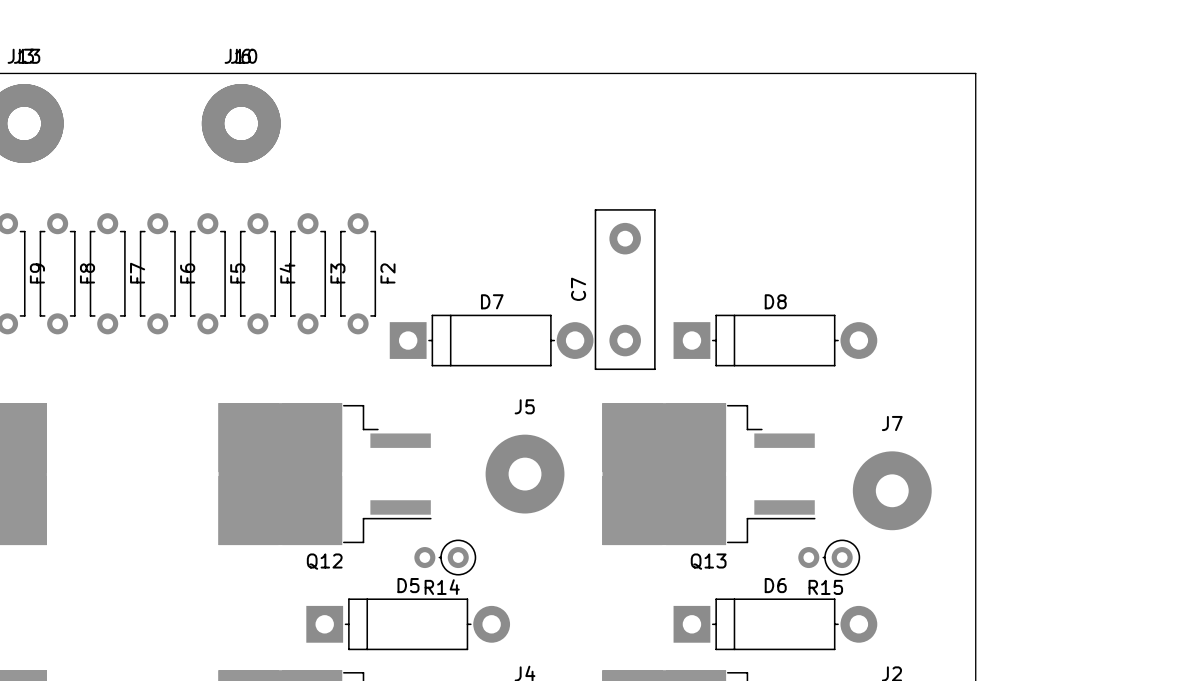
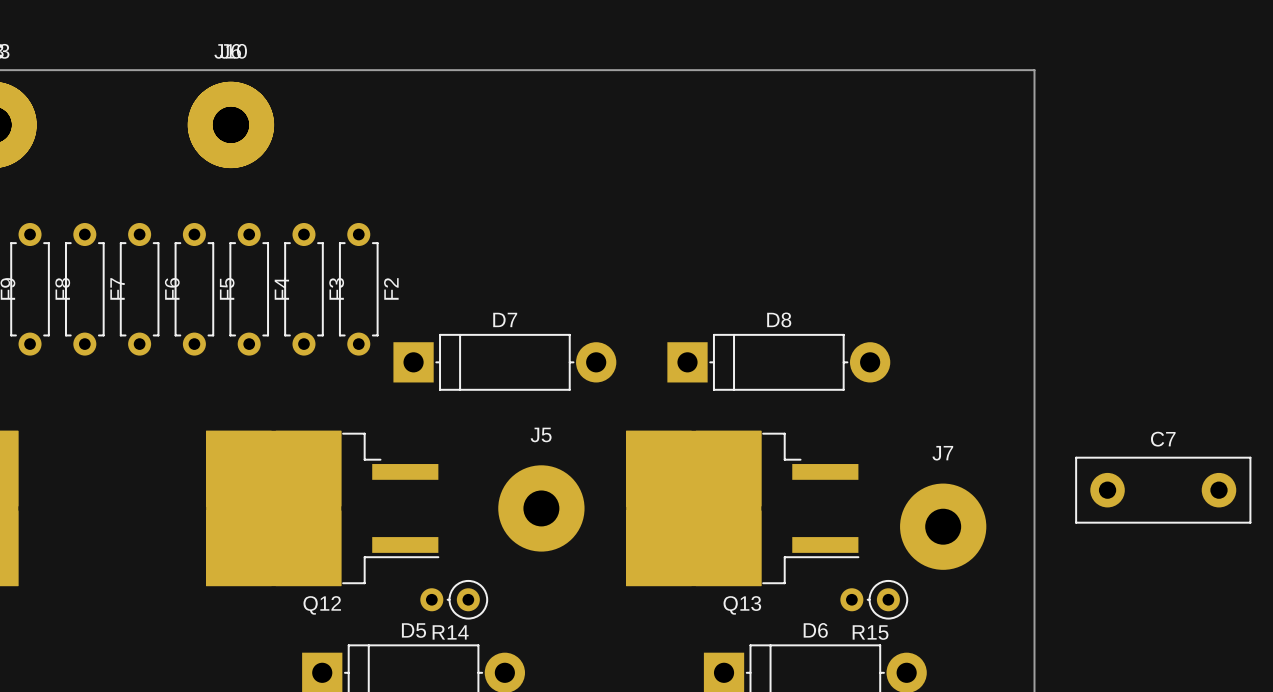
C7 rotation: 0° (625, 289) -> 90° clockwise (1163, 490)
C7 position: (625, 289) -> (1163, 490)
D8 position: (775, 340) -> (778, 362)

